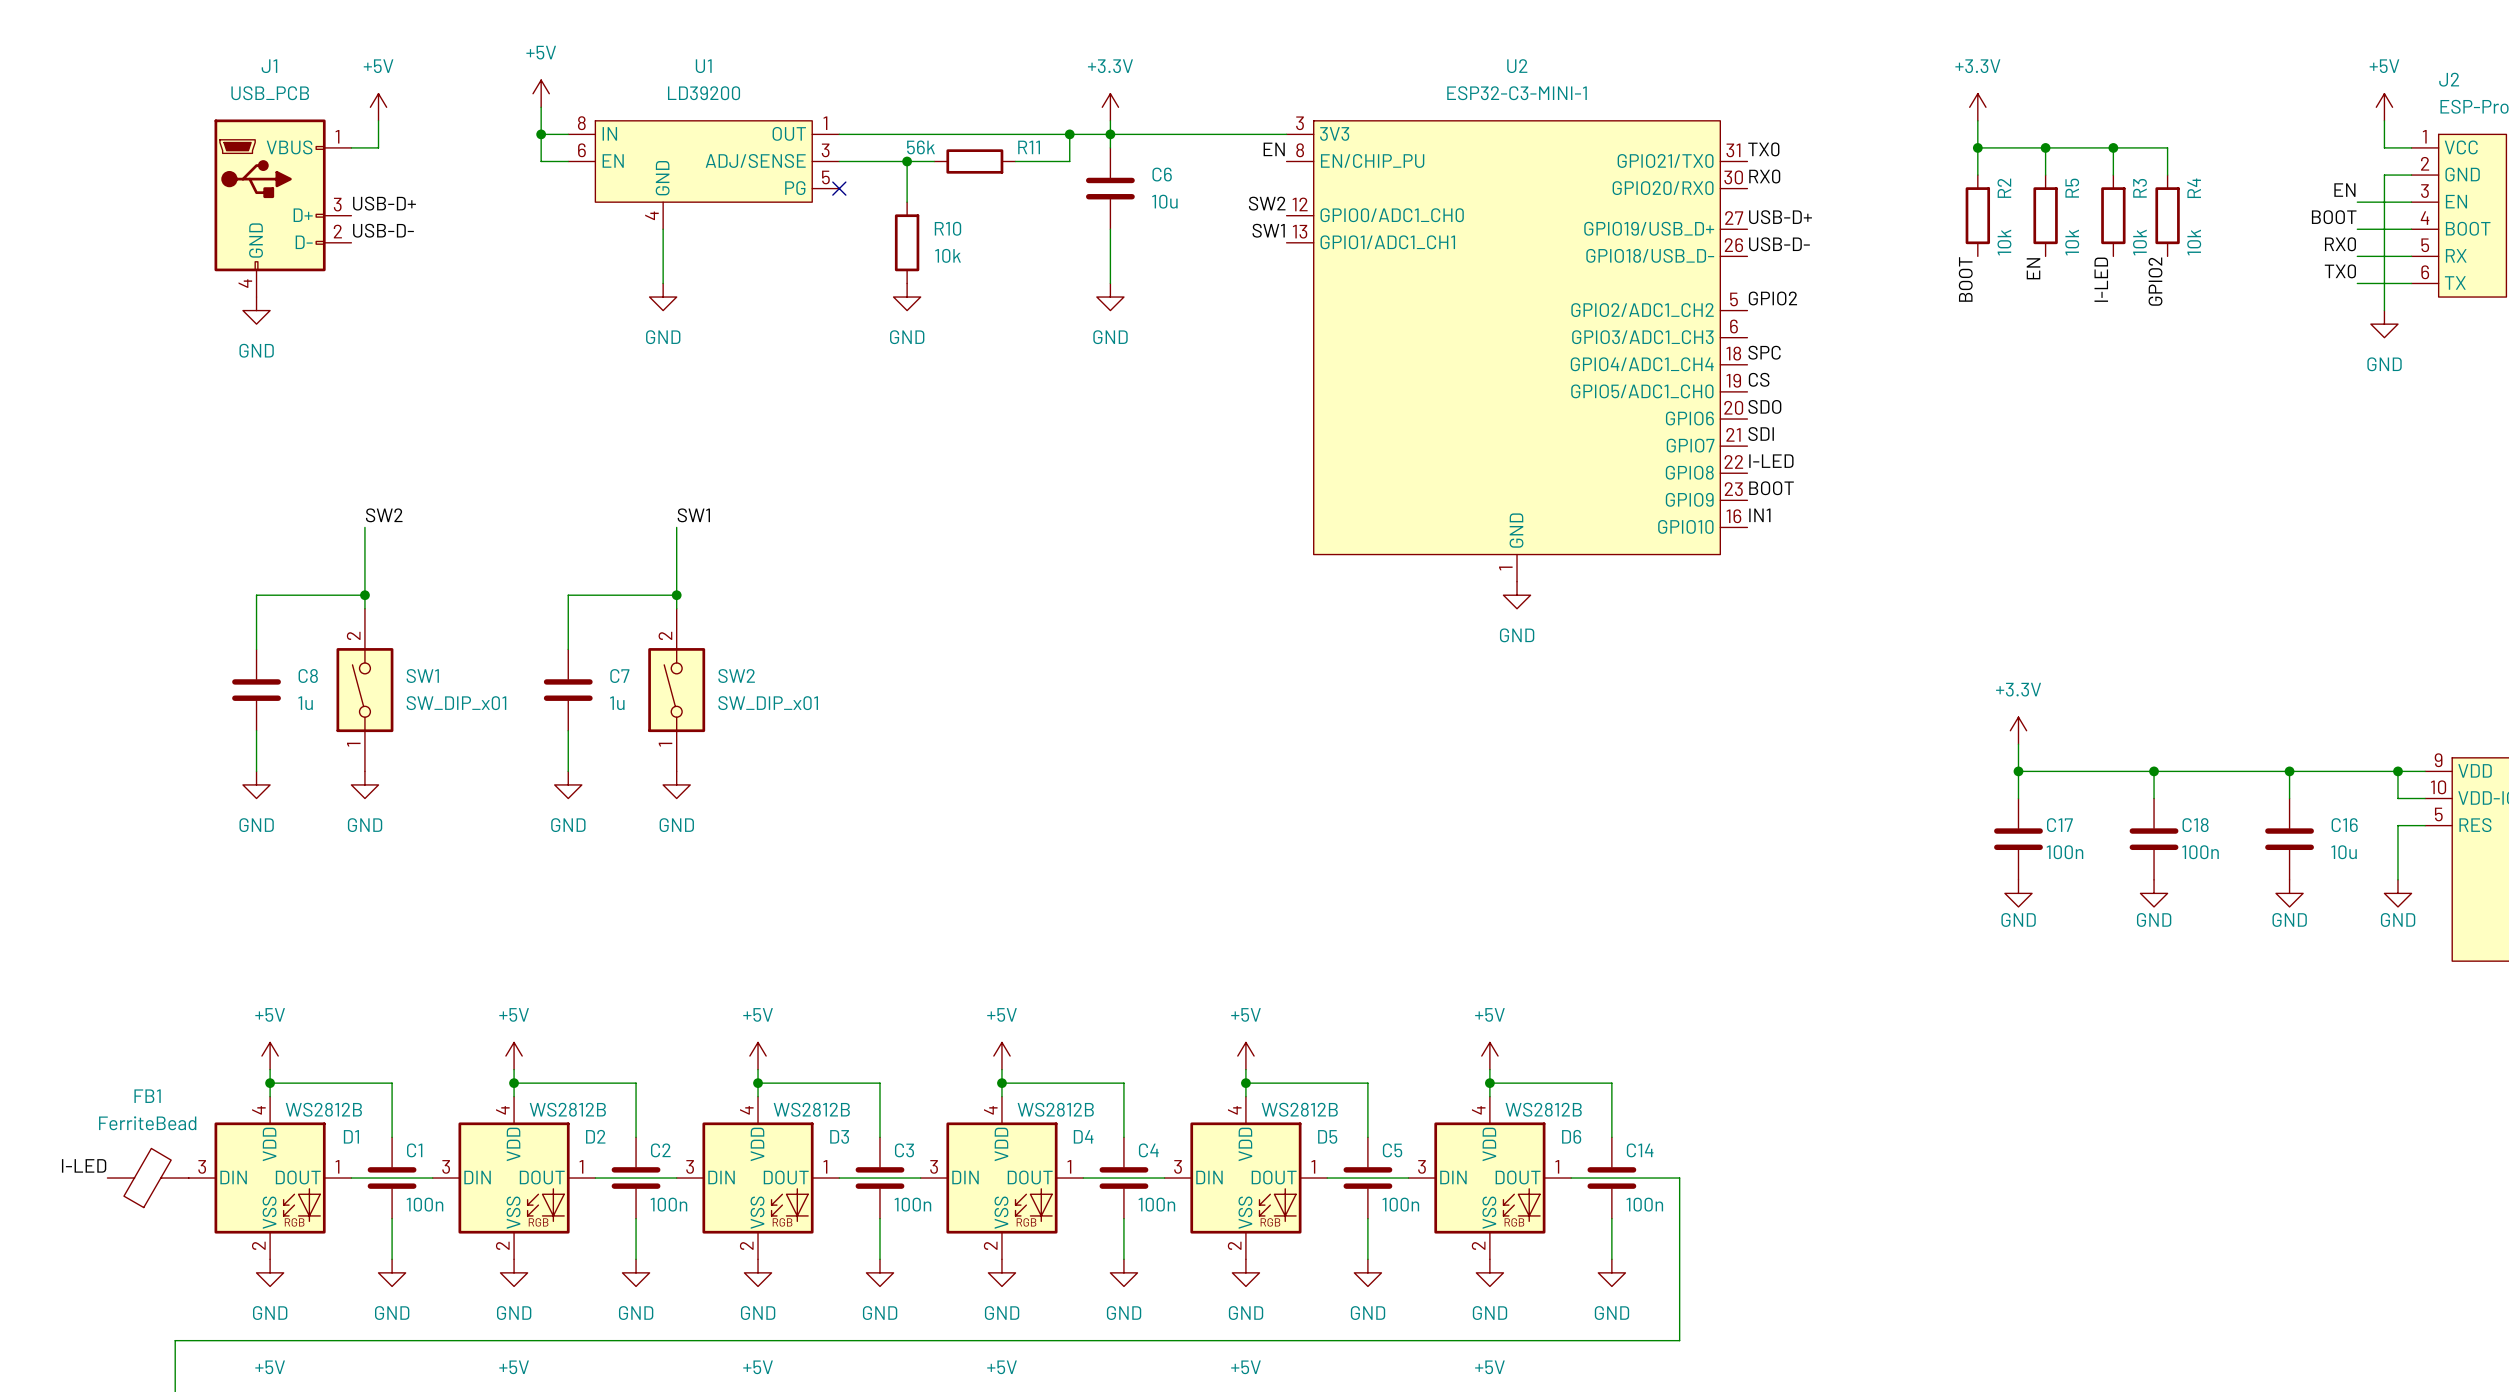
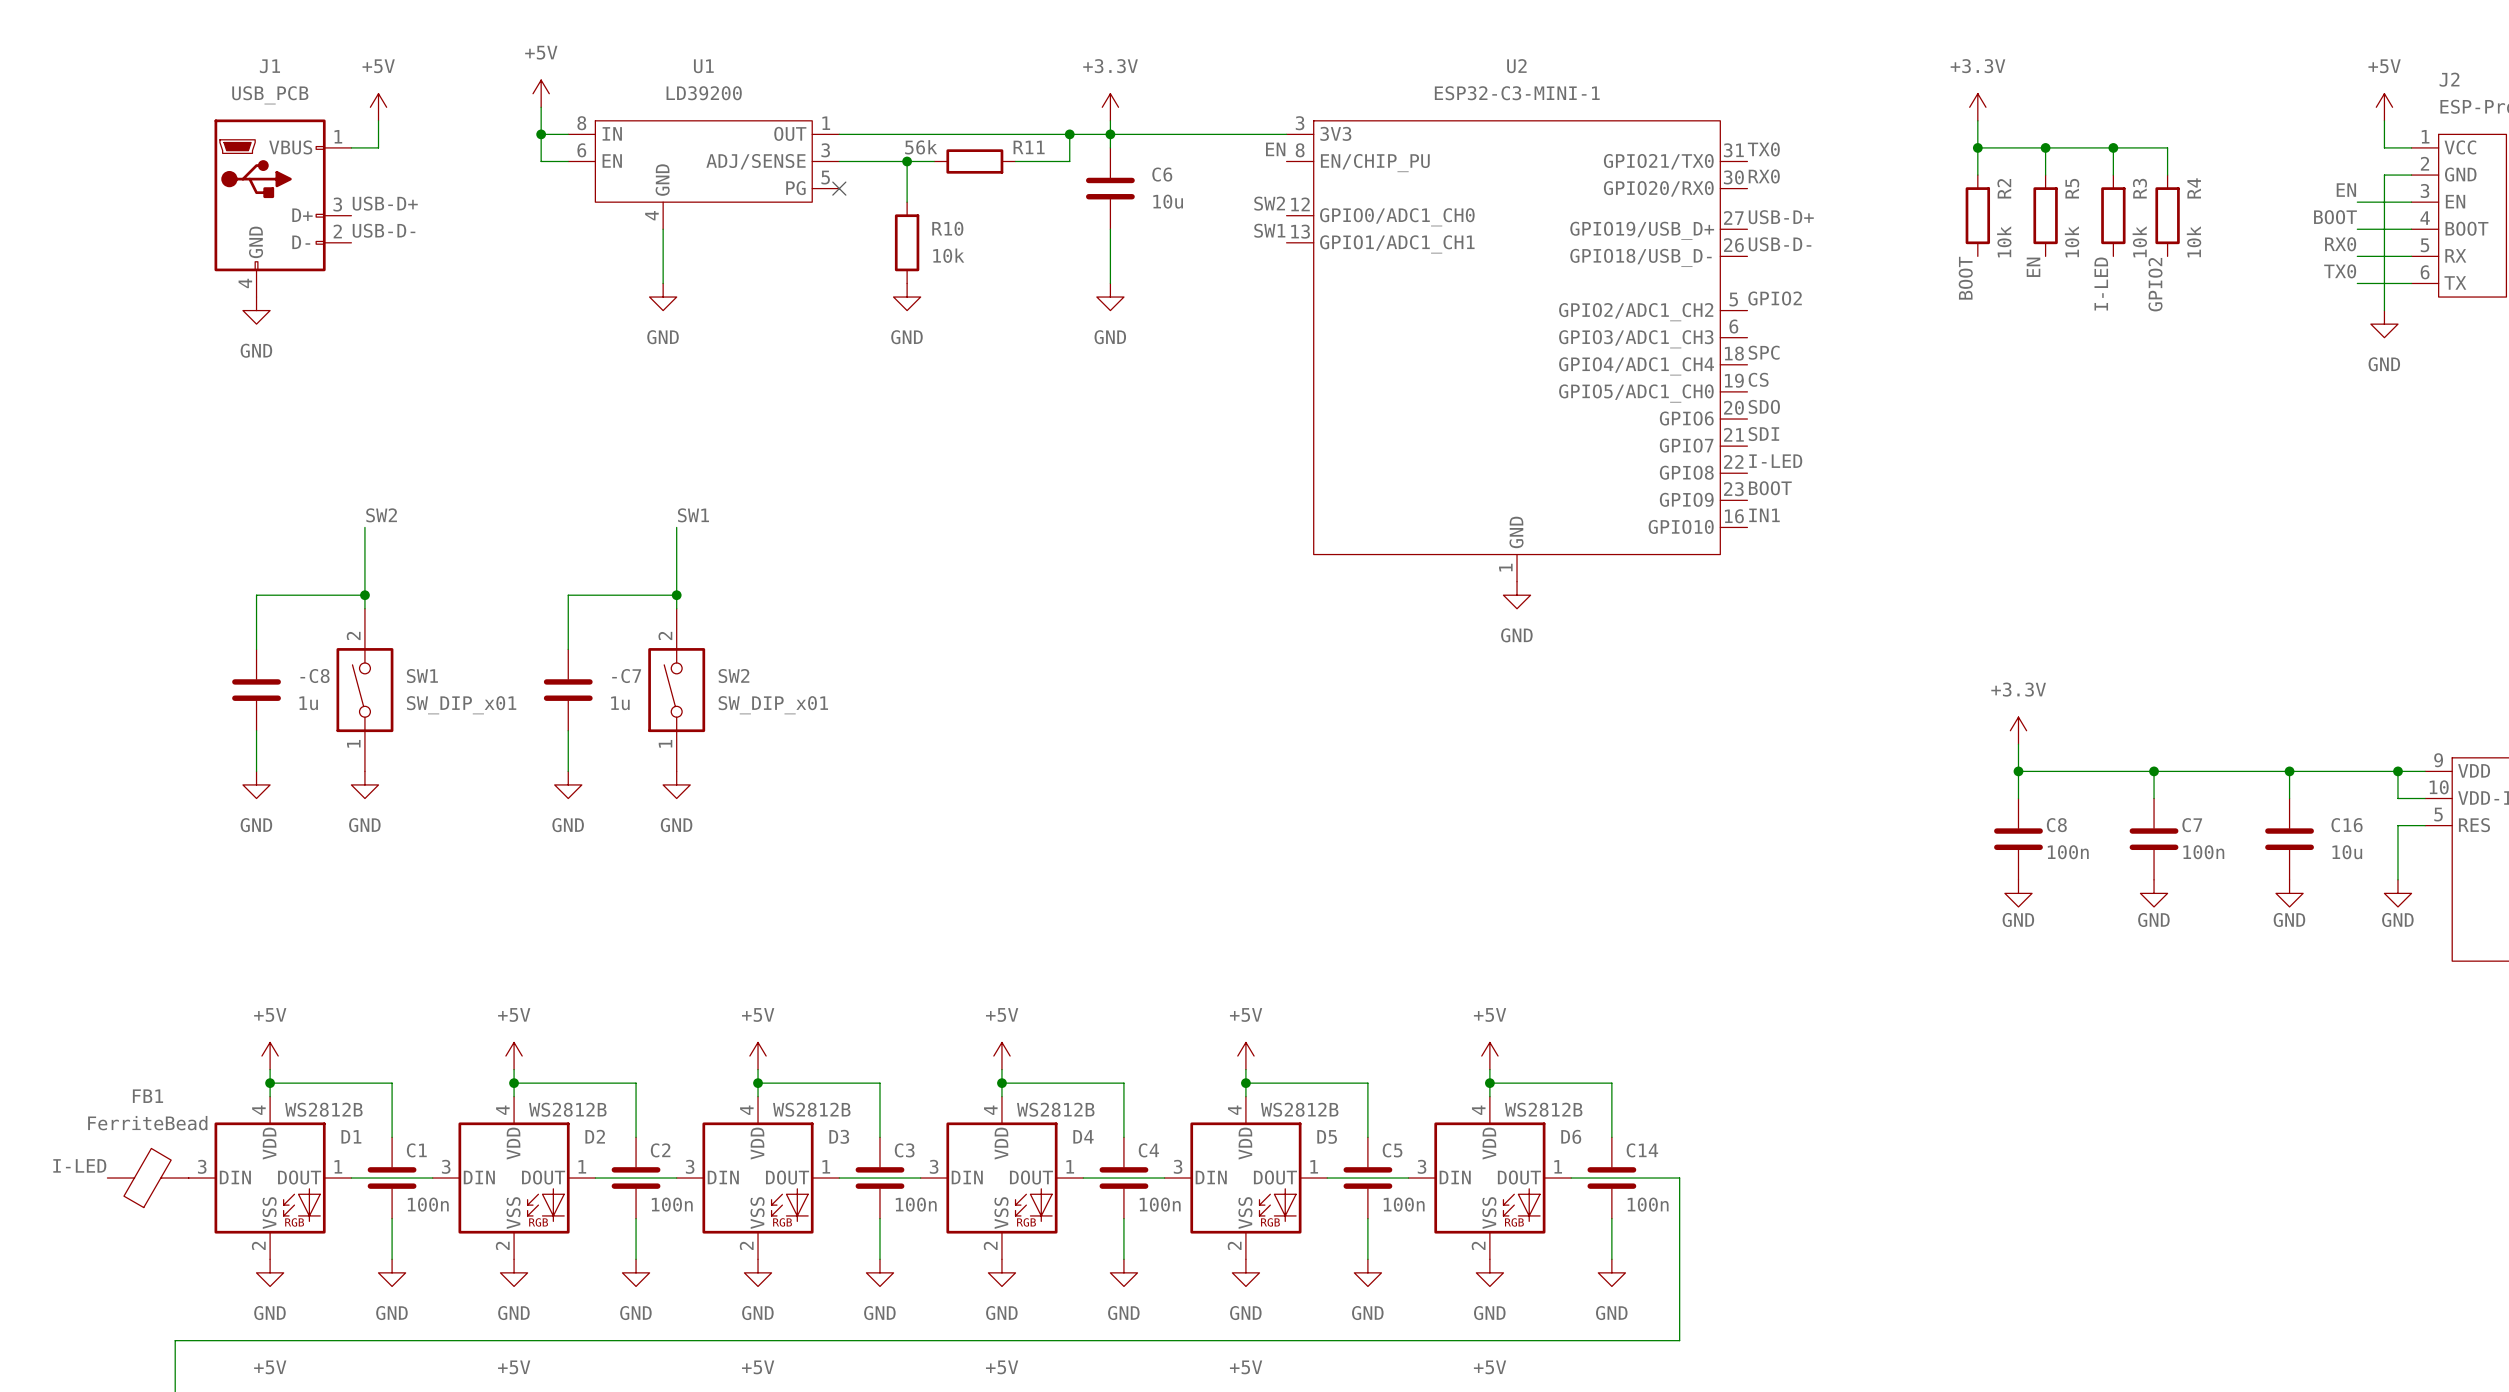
C8 name: C8 (308, 676) -> -C8 (315, 676)
C7 name: C7 (619, 676) -> -C7 (626, 676)
C17 name: C17 (2059, 825) -> C8 (2056, 825)
C18 name: C18 (2195, 825) -> C7 (2192, 825)

